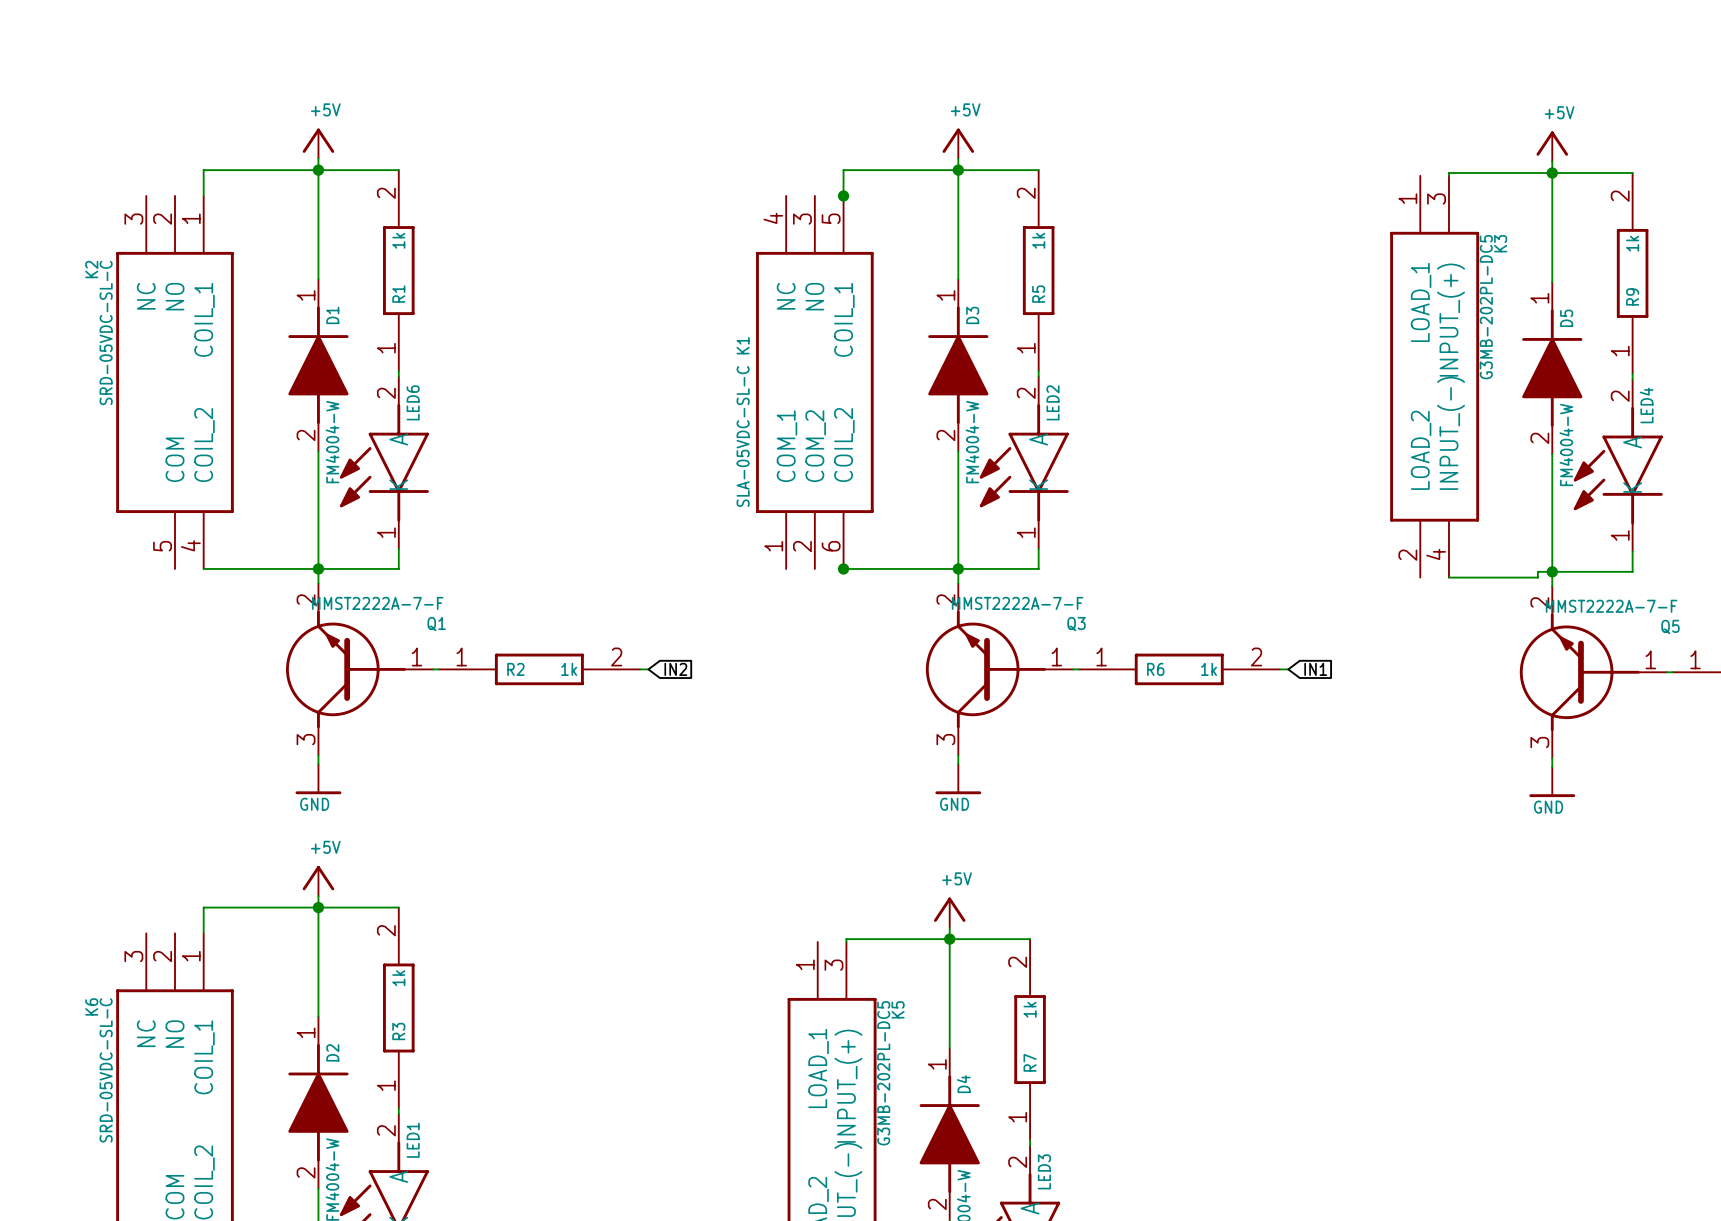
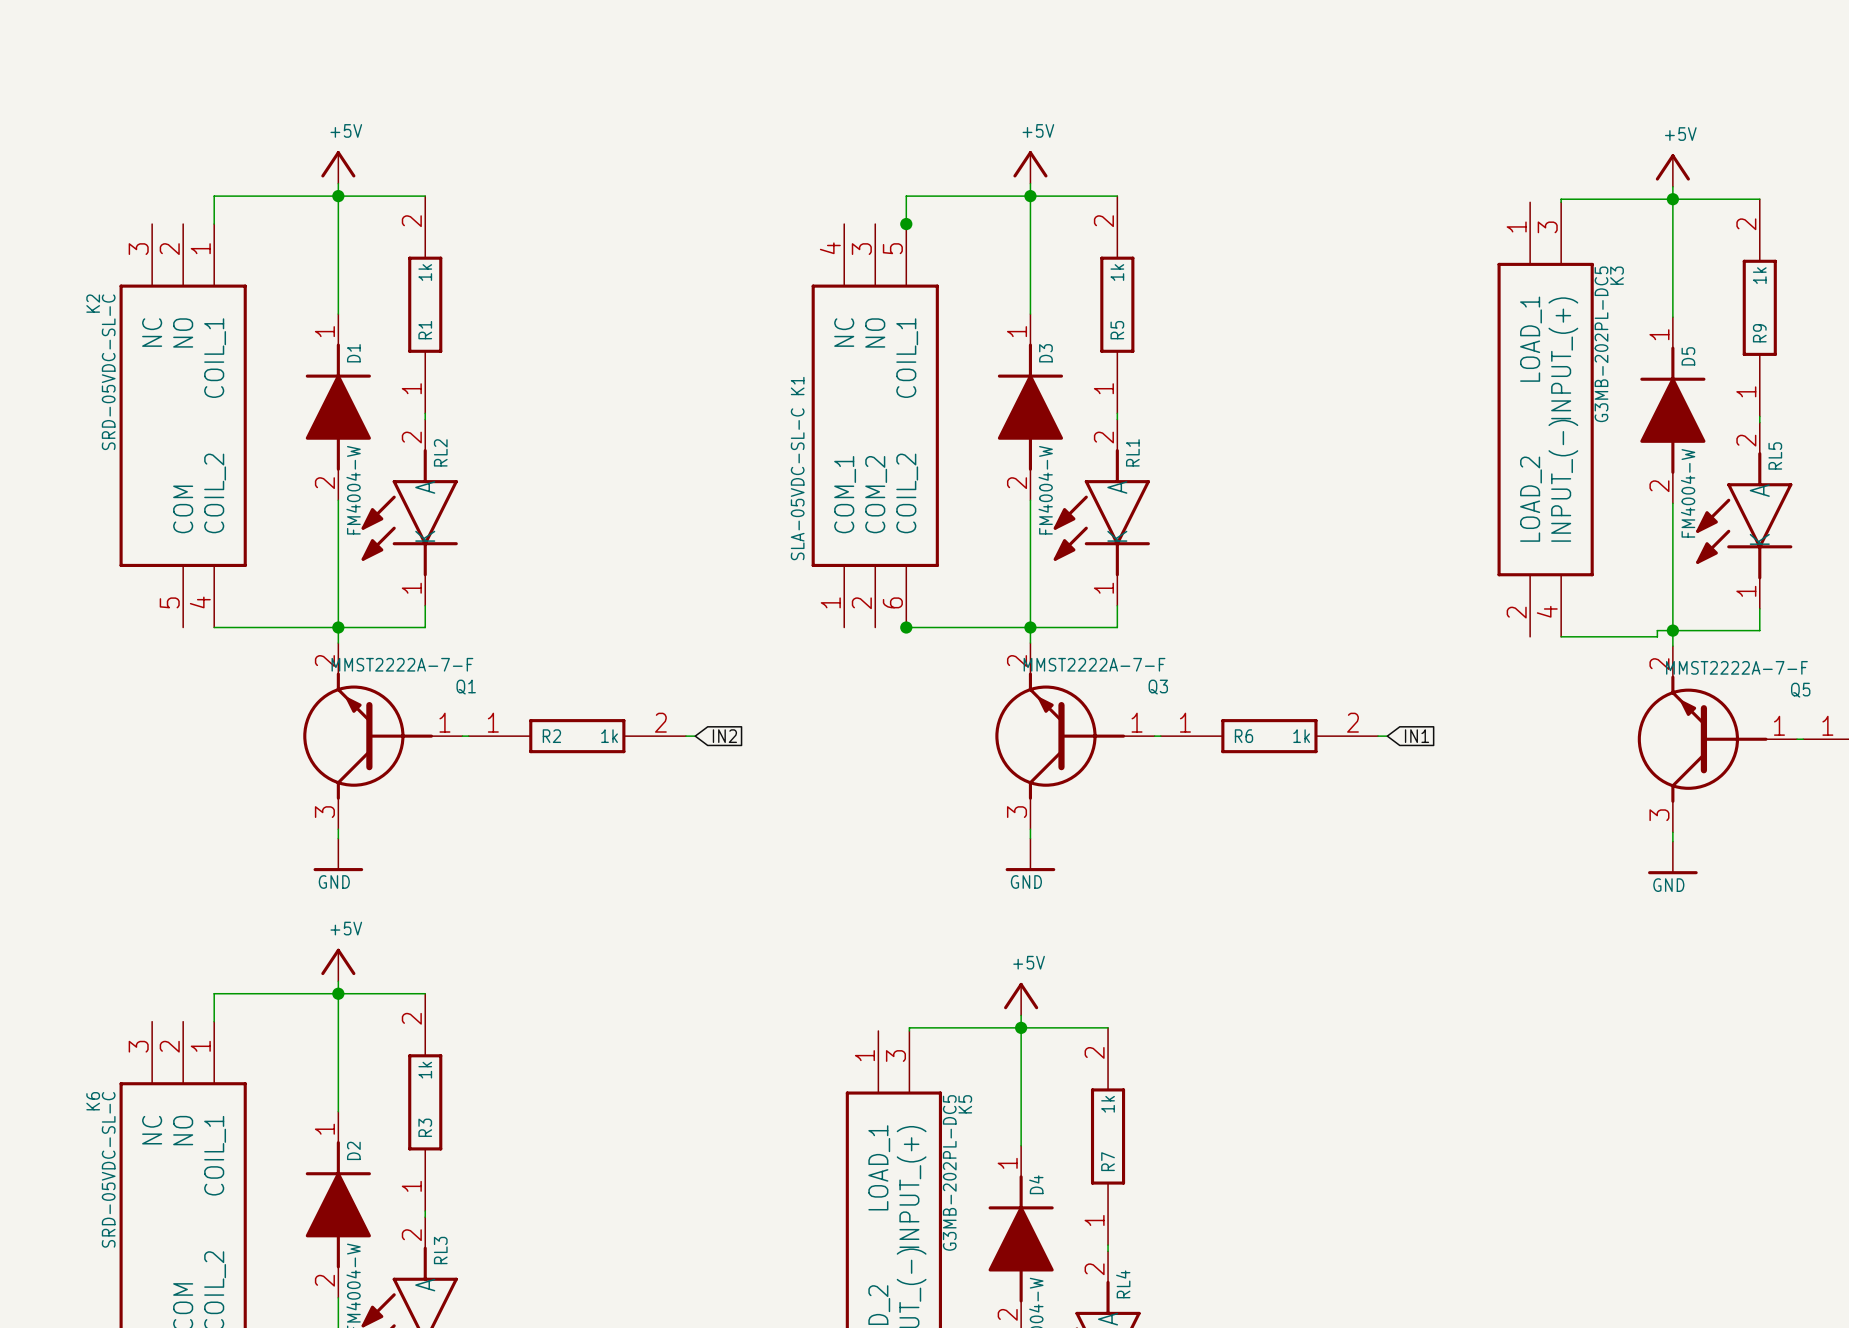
LED6 name: LED6 (413, 402) -> RL2 (440, 452)
LED2 name: LED2 (1053, 402) -> RL1 (1132, 452)
LED4 name: LED4 (1646, 405) -> RL5 (1775, 455)
LED1 name: LED1 (413, 1140) -> RL3 (440, 1250)
LED3 name: LED3 (1044, 1171) -> RL4 (1123, 1284)

